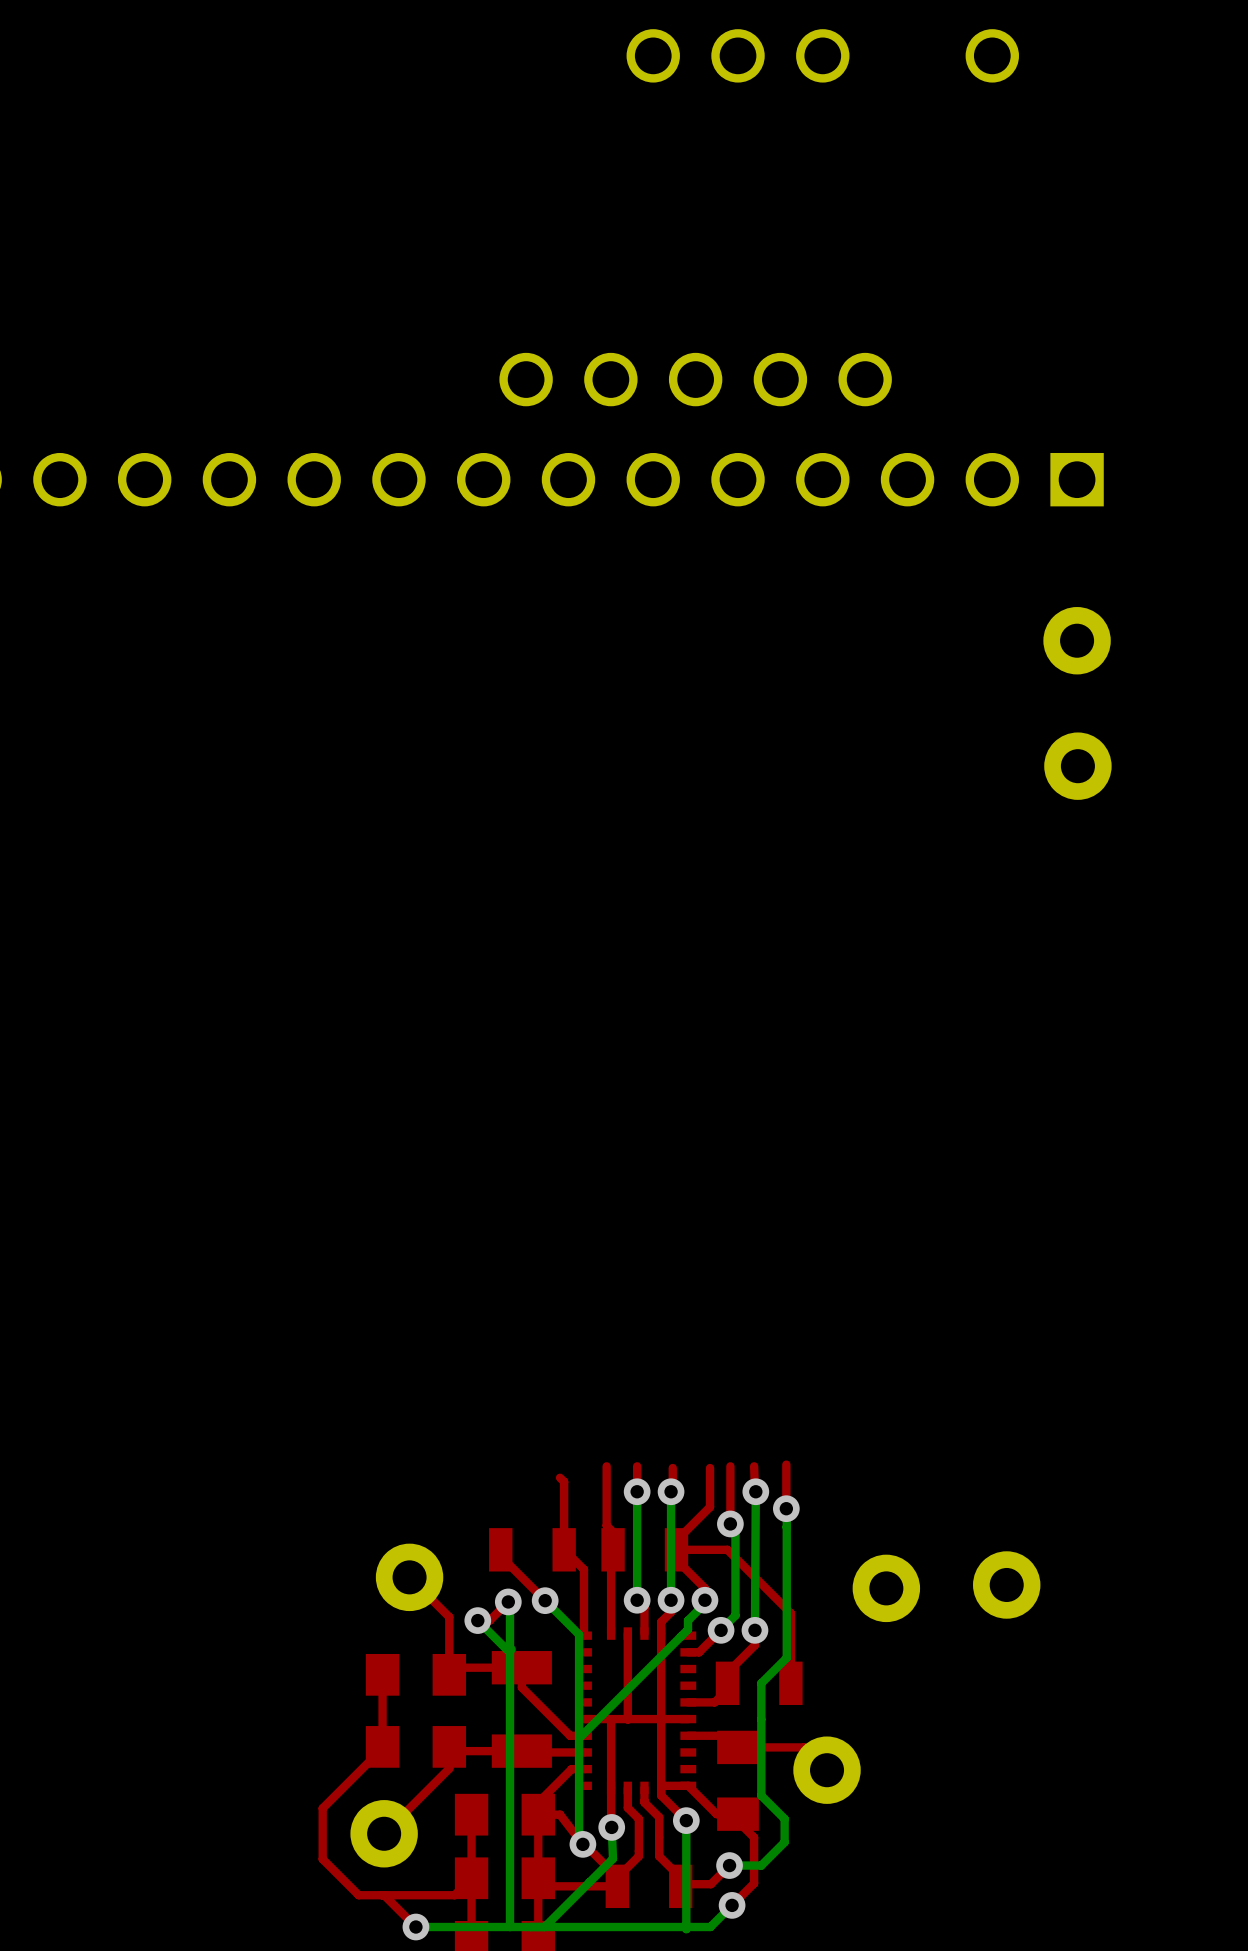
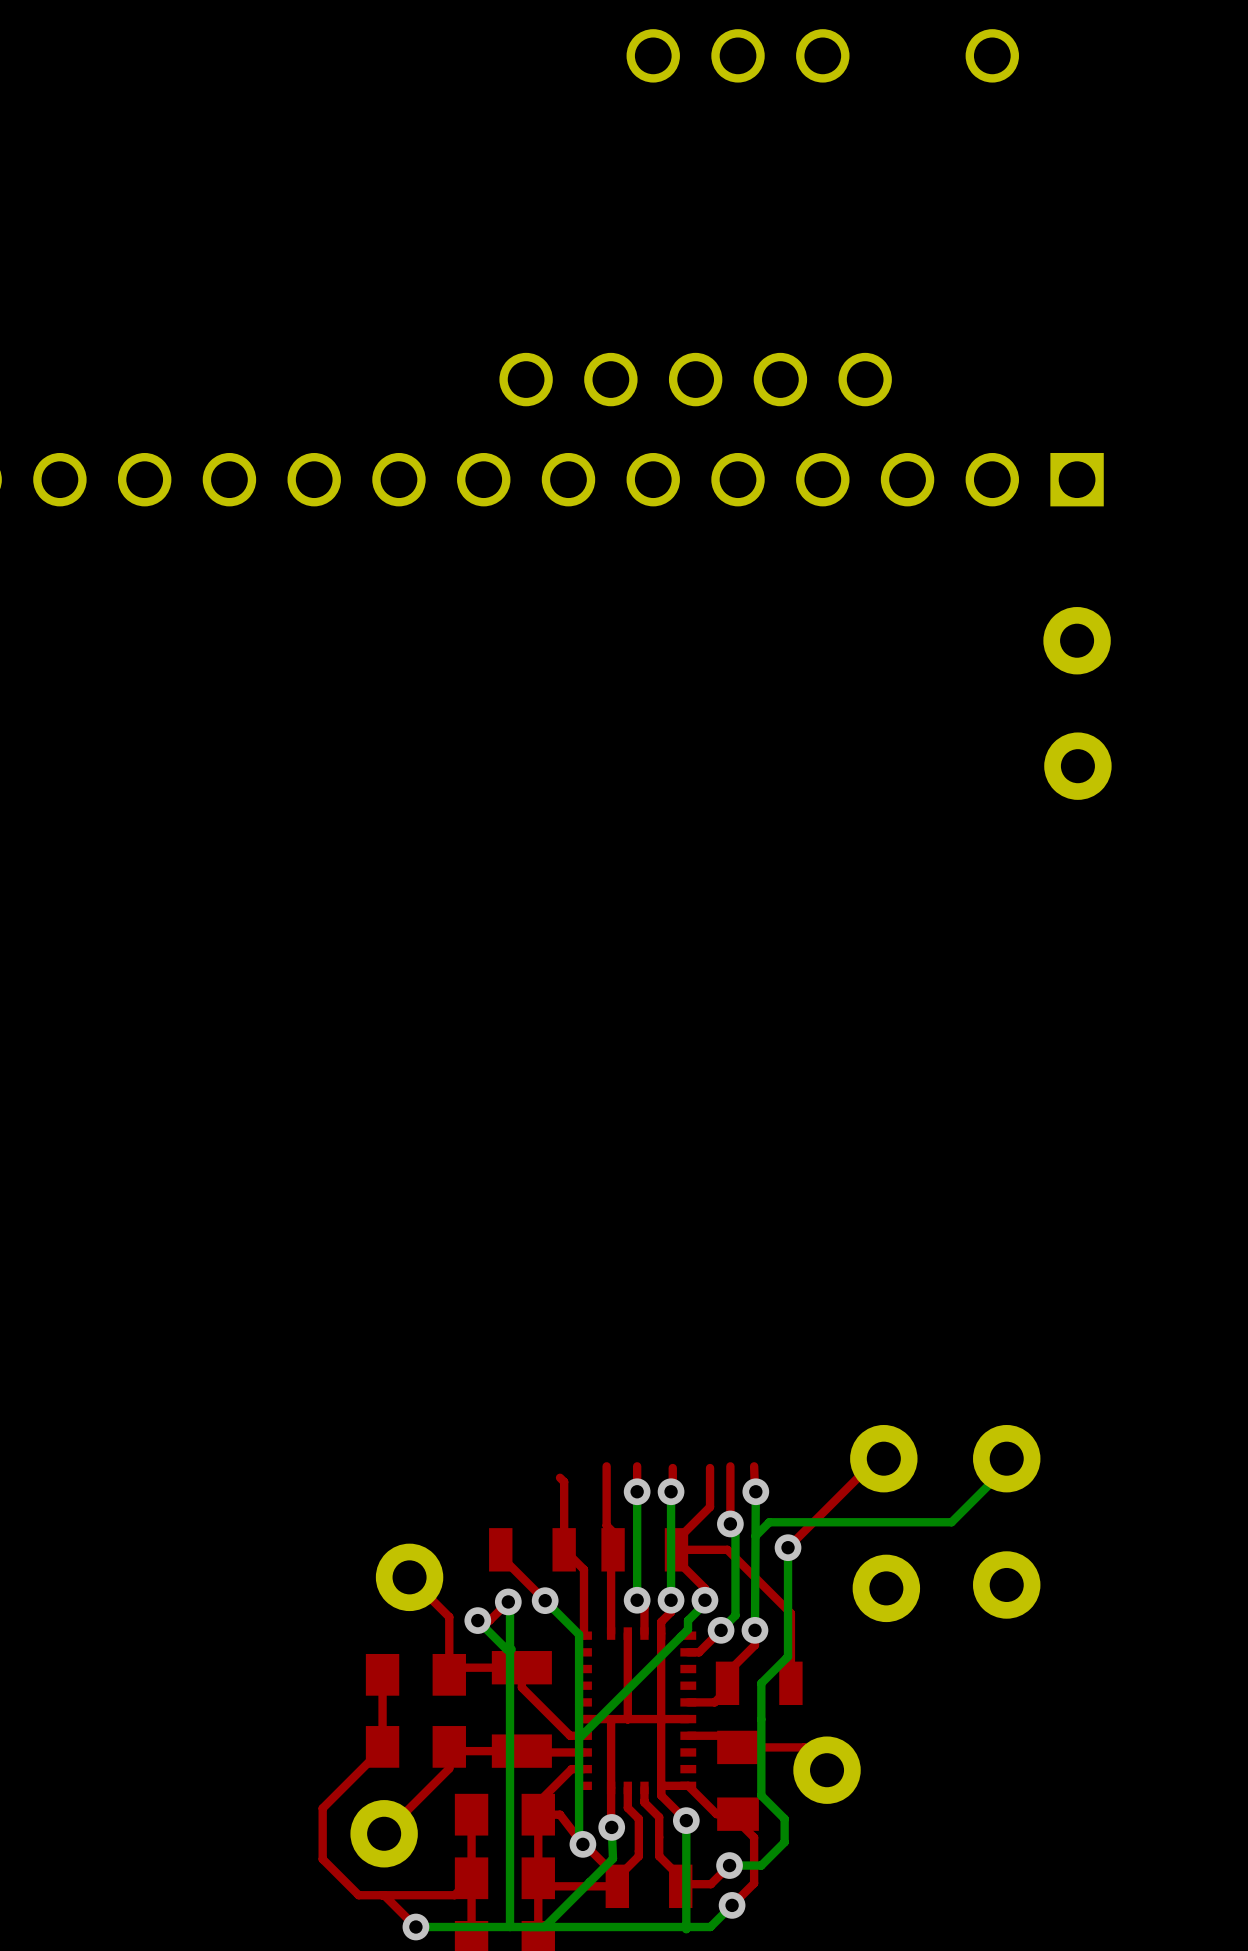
top track: none -> (883, 1458) (877, 1458) (788, 1547)
part: none -> (883, 1458)
bottom track: none -> (1006, 1458) (1006, 1467) (951, 1522) (769, 1522) (755, 1536)
part: none -> (1006, 1458)
top track: (786, 1464) (786, 1508) -> none
via position: (786, 1508) -> (788, 1547)
bottom track: (786, 1509) (786, 1657) -> (788, 1547) (786, 1657)

